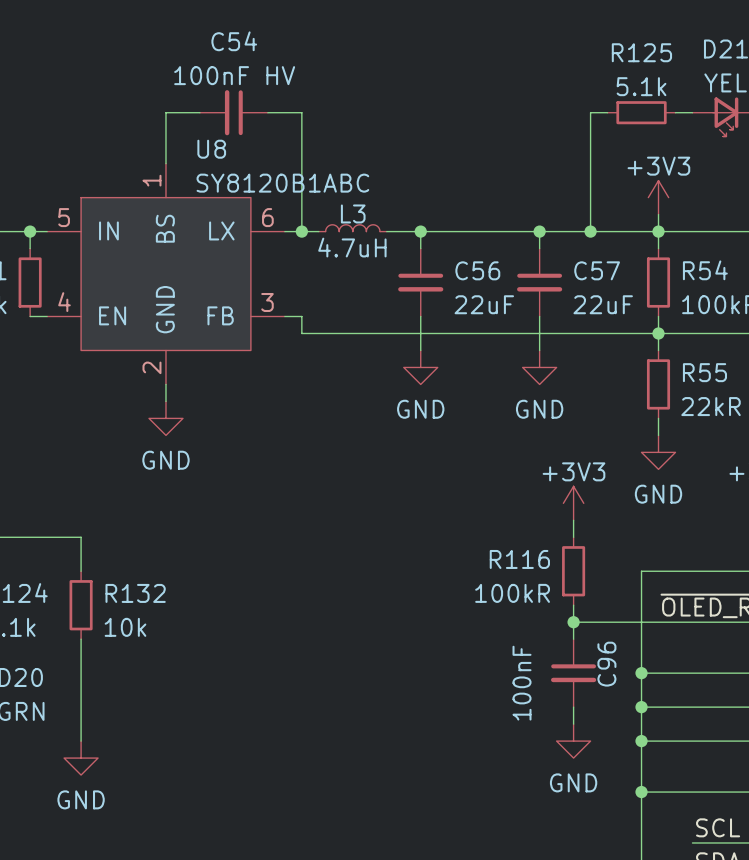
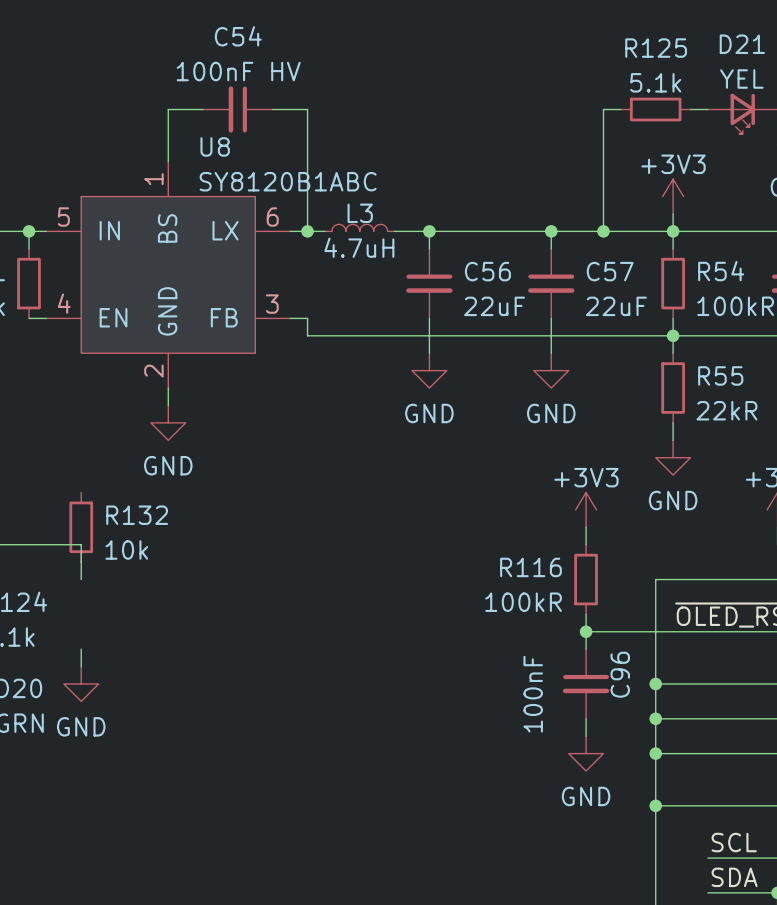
R132 position: (81, 605) -> (81, 527)
wire: (81, 656) (81, 741) -> none
power symbol: none -> GND (81, 683)
power symbol: GND (81, 758) -> none

